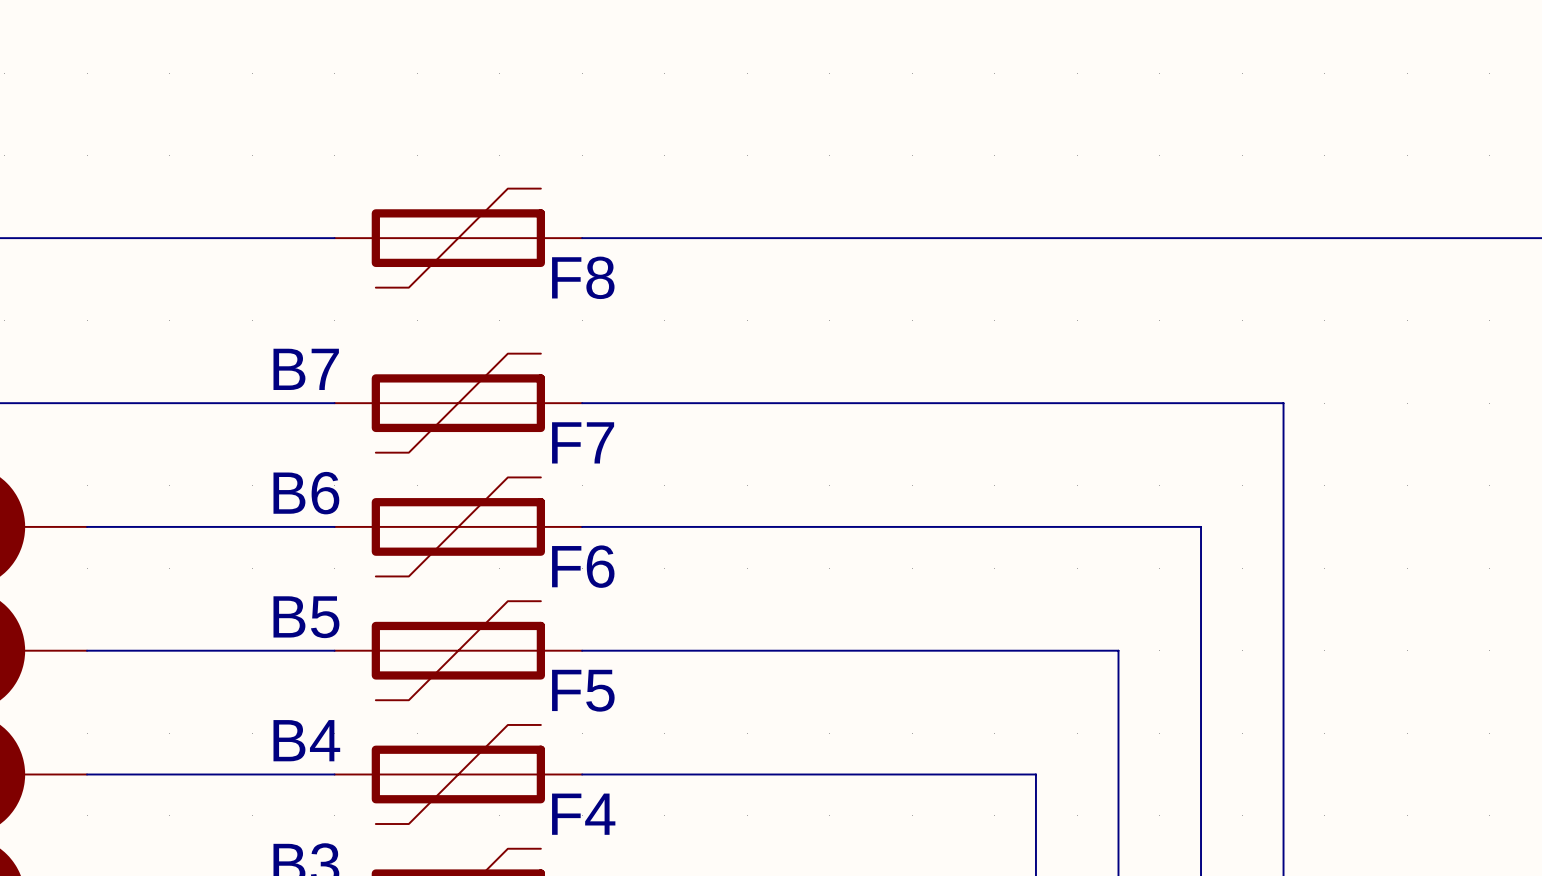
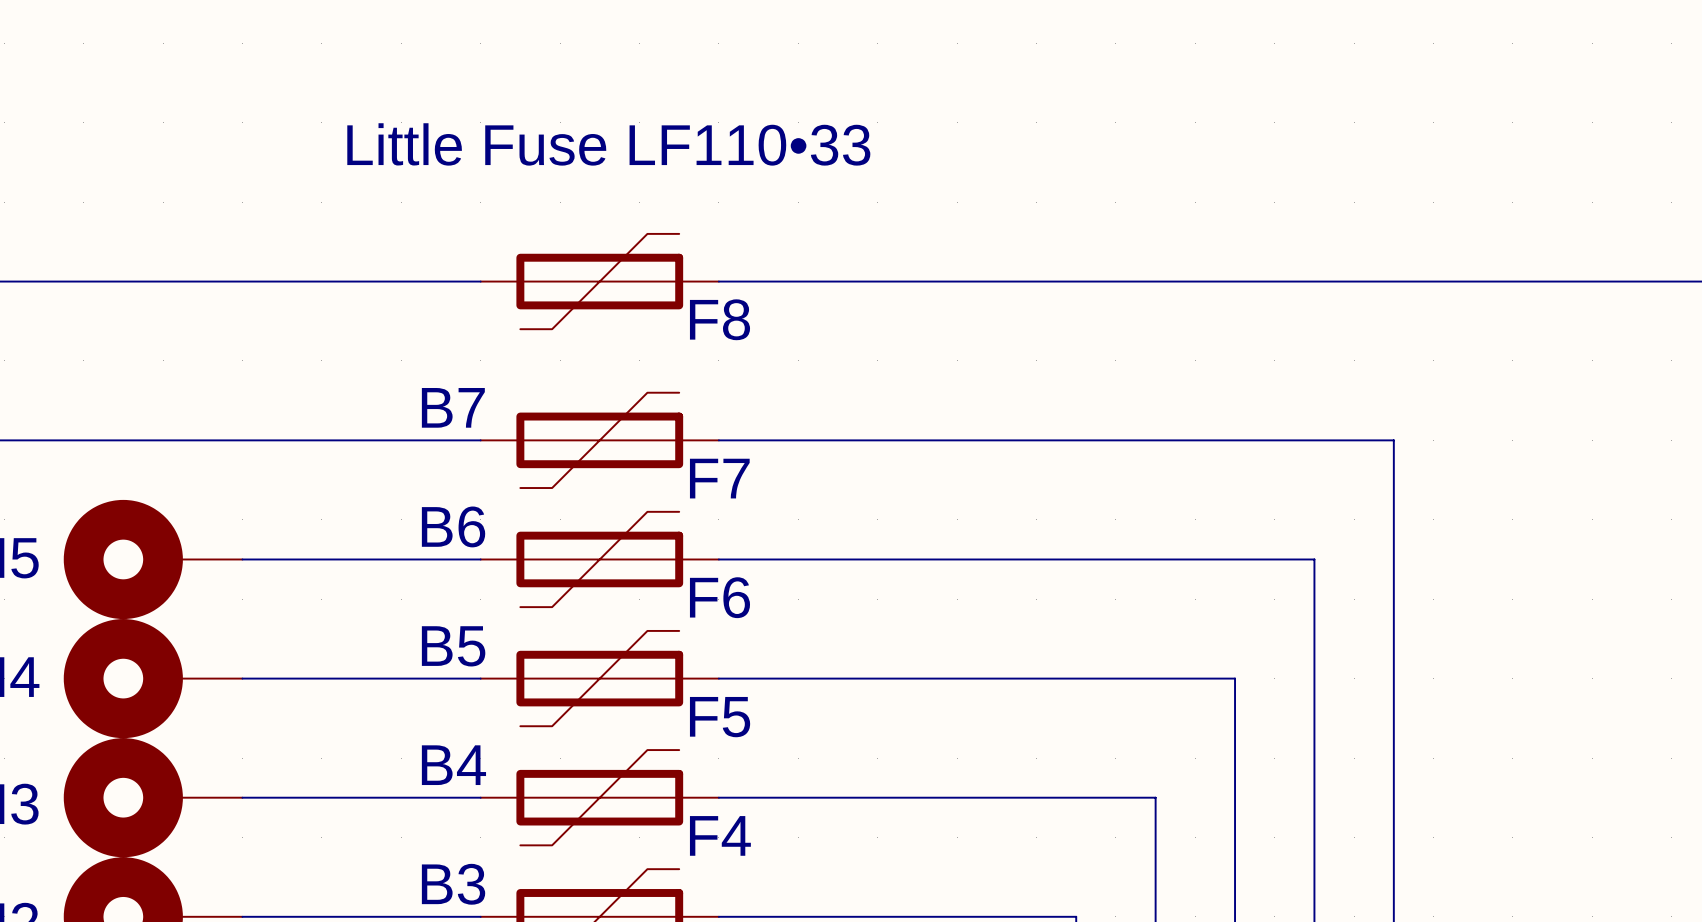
text: none -> Little Fuse LF110•33 (608, 144)

